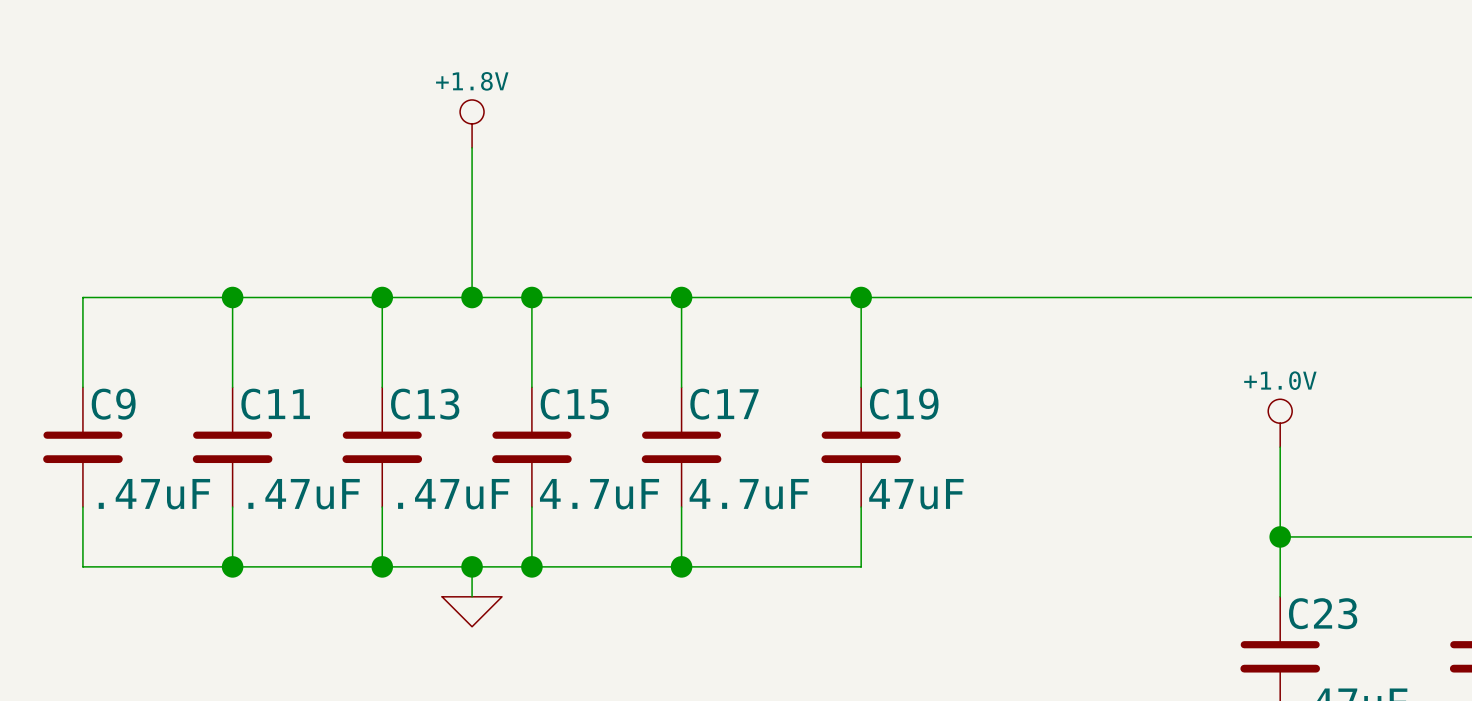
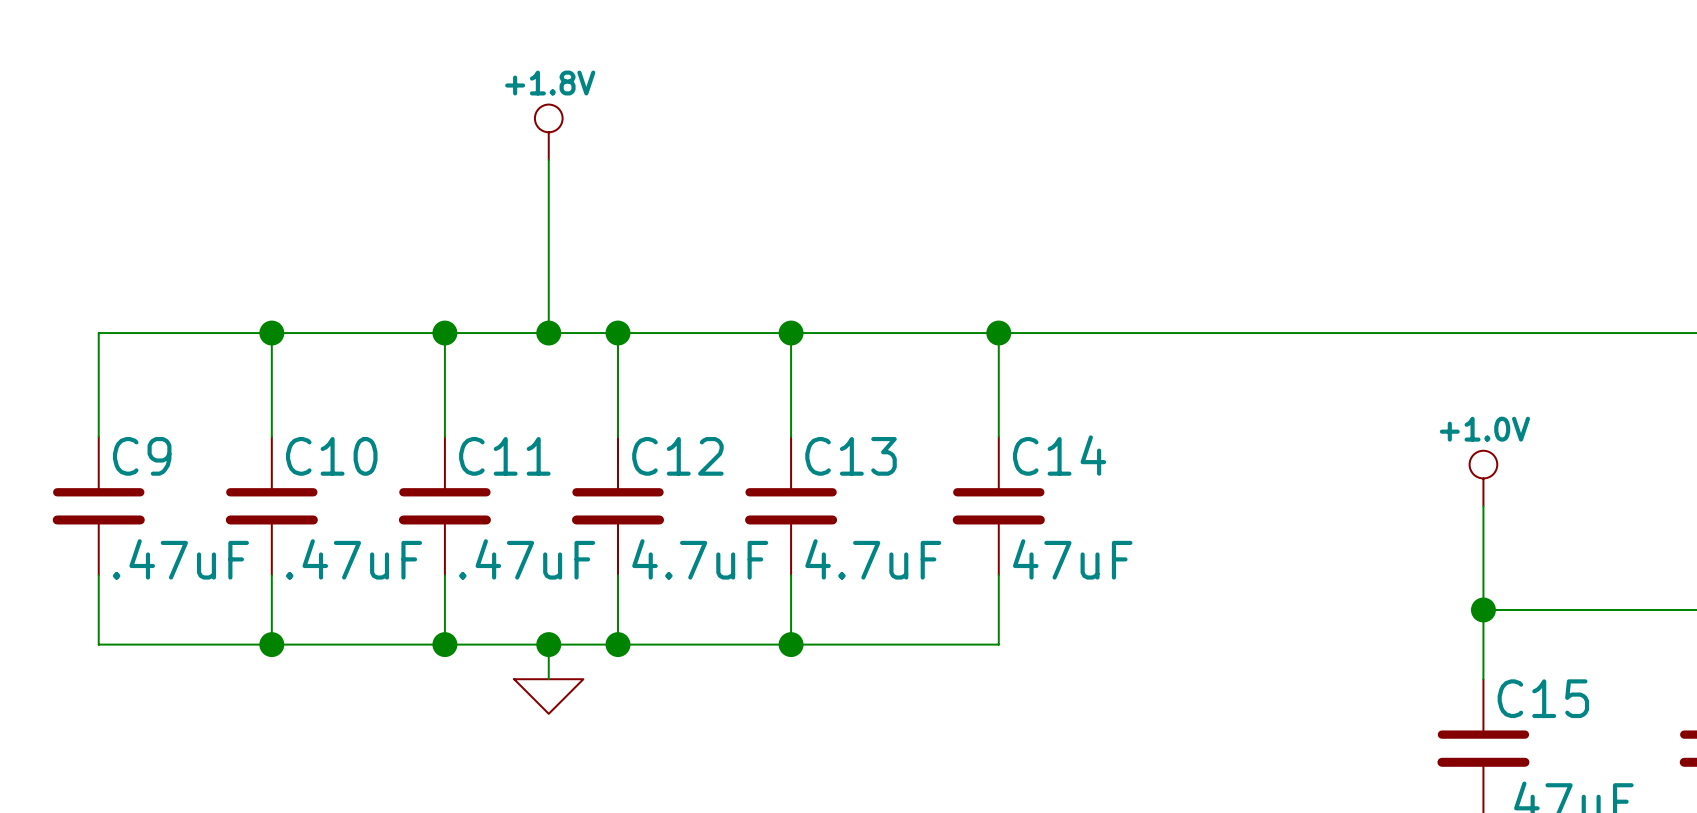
C11 name: C11 (275, 404) -> C10 (331, 456)
C13 name: C13 (425, 404) -> C11 (504, 456)
C15 name: C15 (574, 404) -> C12 (677, 456)
C17 name: C17 (724, 404) -> C13 (851, 456)
C19 name: C19 (904, 404) -> C14 (1059, 455)
C23 name: C23 (1323, 613) -> C15 (1543, 698)

